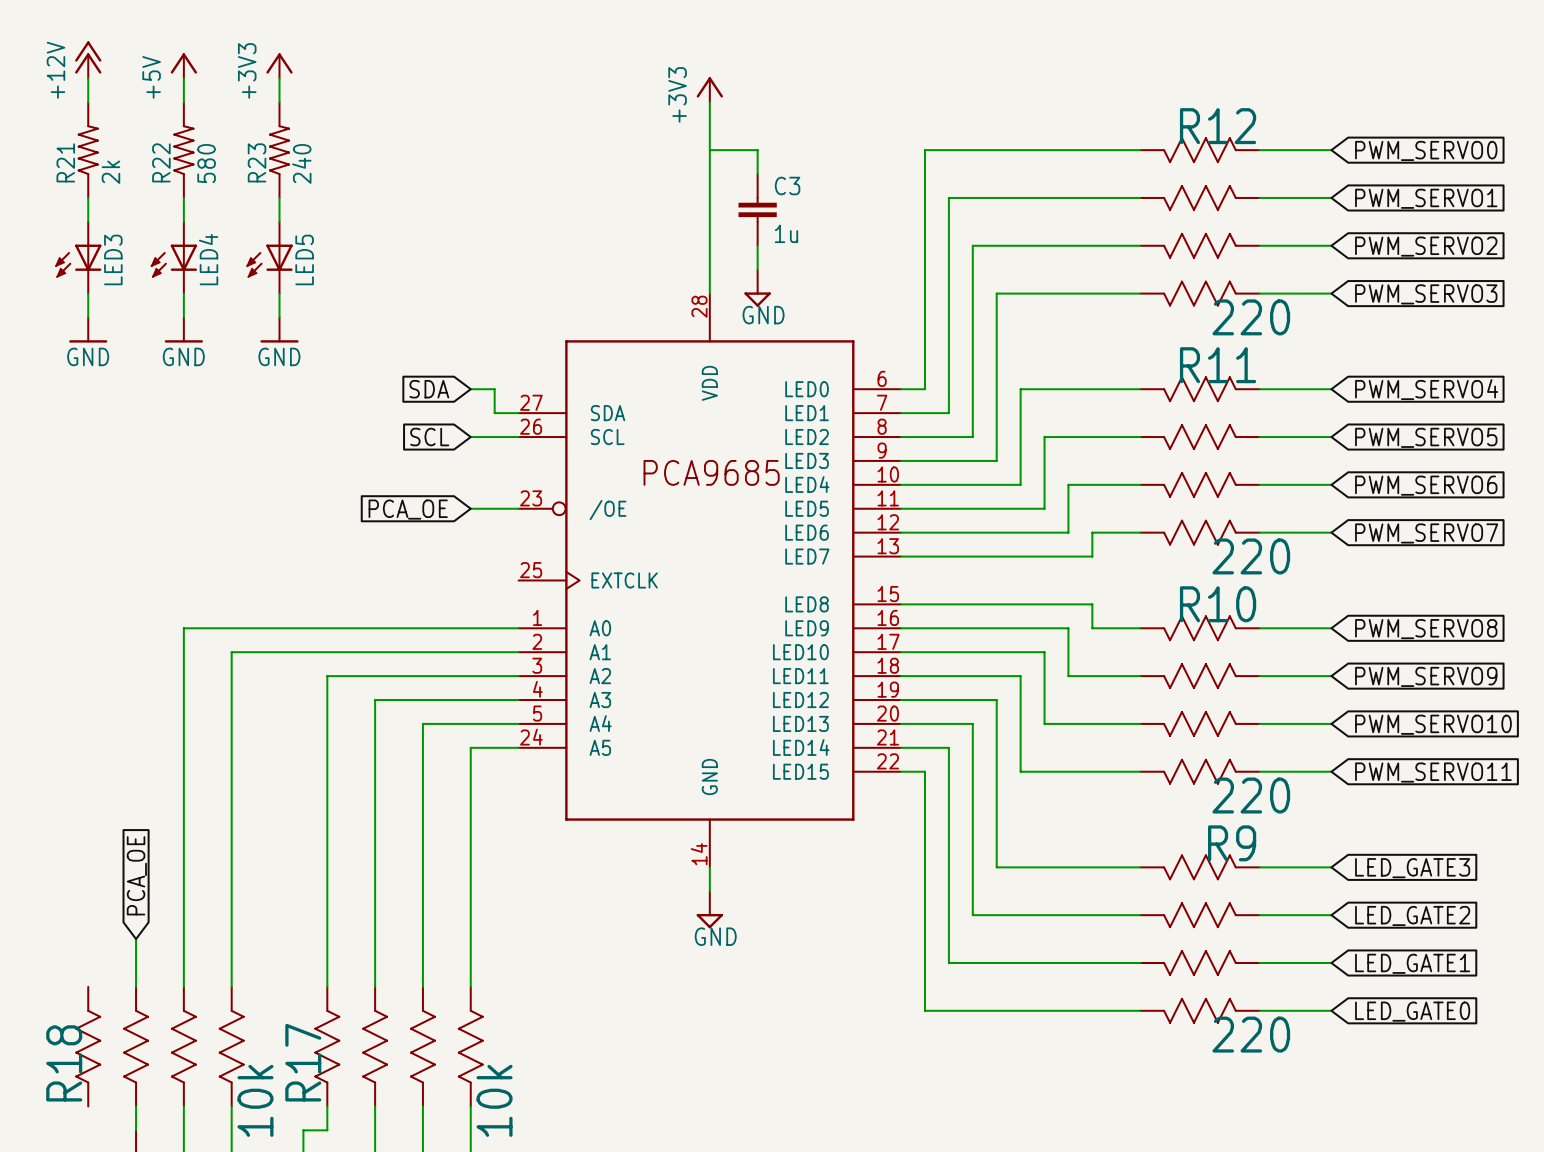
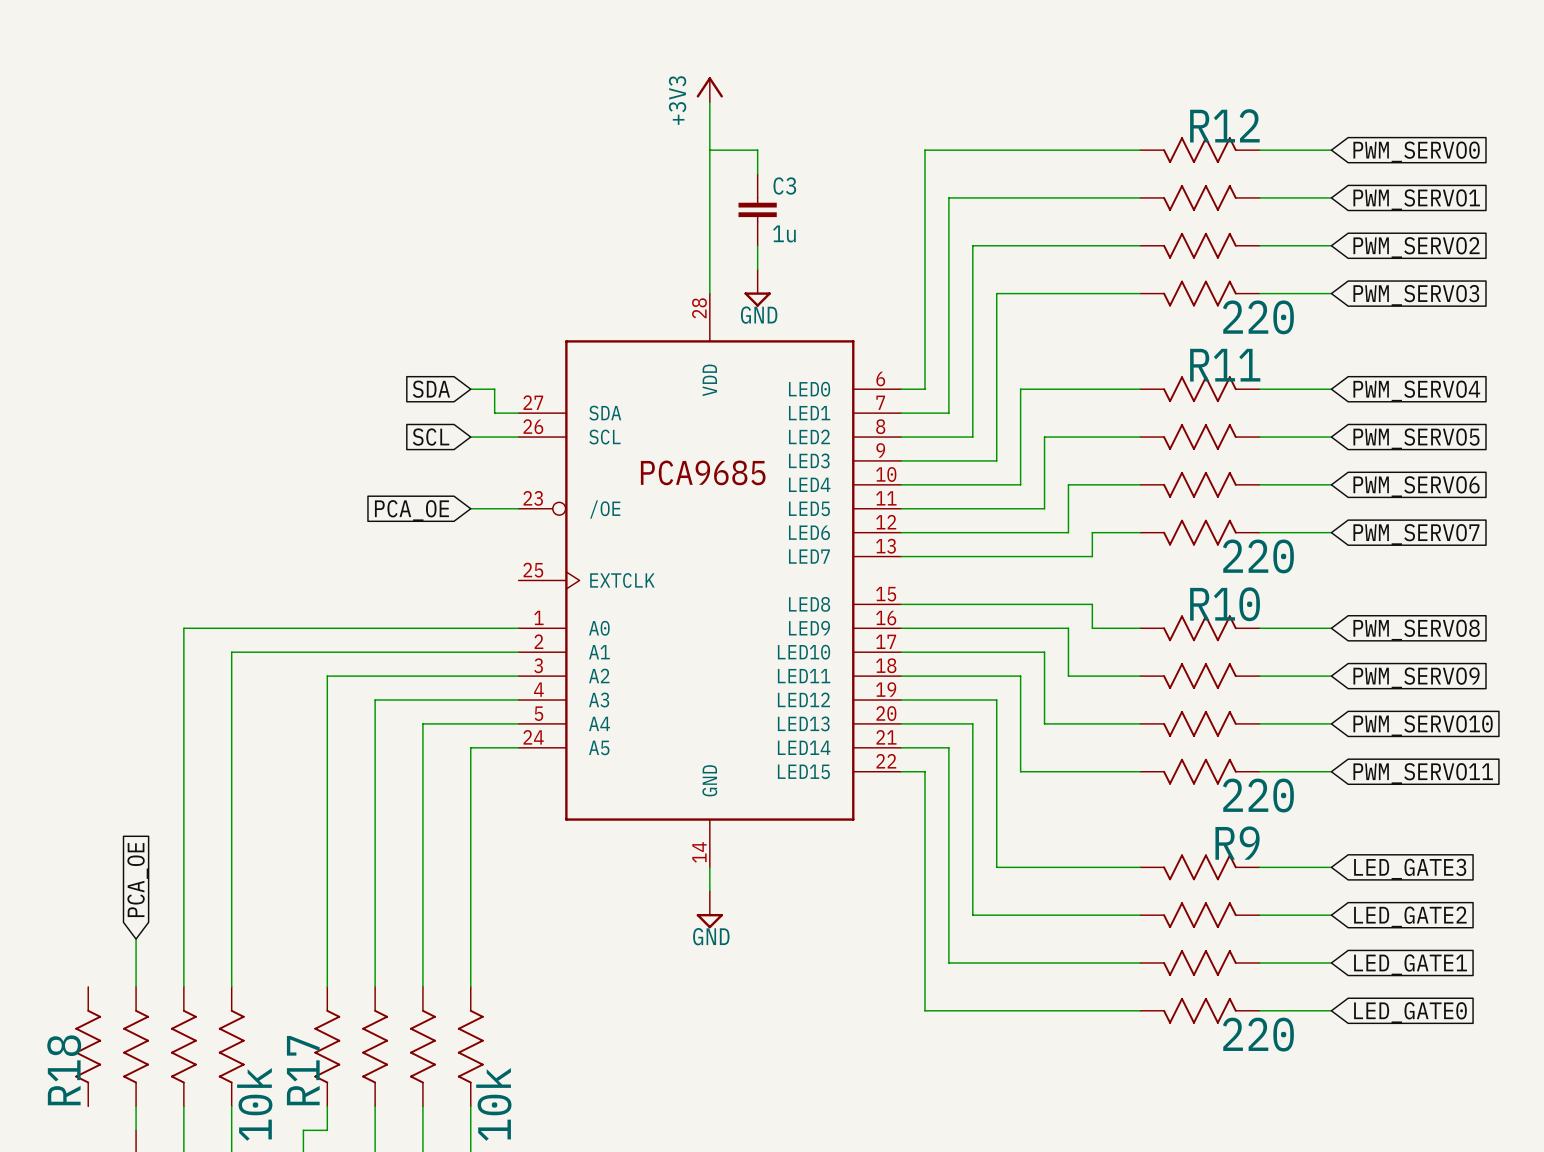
power symbol: +12V (88, 59) -> none
power symbol: +5V (183, 65) -> none
power symbol: +3V3 (279, 65) -> none
wire: (88, 78) (88, 102) -> none
wire: (183, 78) (183, 102) -> none
wire: (279, 78) (279, 102) -> none
R21: 2k (88, 150) -> none
R22: 580 (183, 150) -> none
R23: 240 (279, 150) -> none
wire: (88, 197) (88, 221) -> none
wire: (183, 197) (183, 221) -> none
wire: (279, 197) (279, 221) -> none
LED3: (78, 257) -> none
LED4: (173, 257) -> none
LED5: (269, 257) -> none
wire: (88, 293) (88, 317) -> none
wire: (183, 293) (183, 317) -> none
wire: (279, 293) (279, 317) -> none
power symbol: GND (88, 330) -> none
power symbol: GND (183, 330) -> none
power symbol: GND (279, 330) -> none

